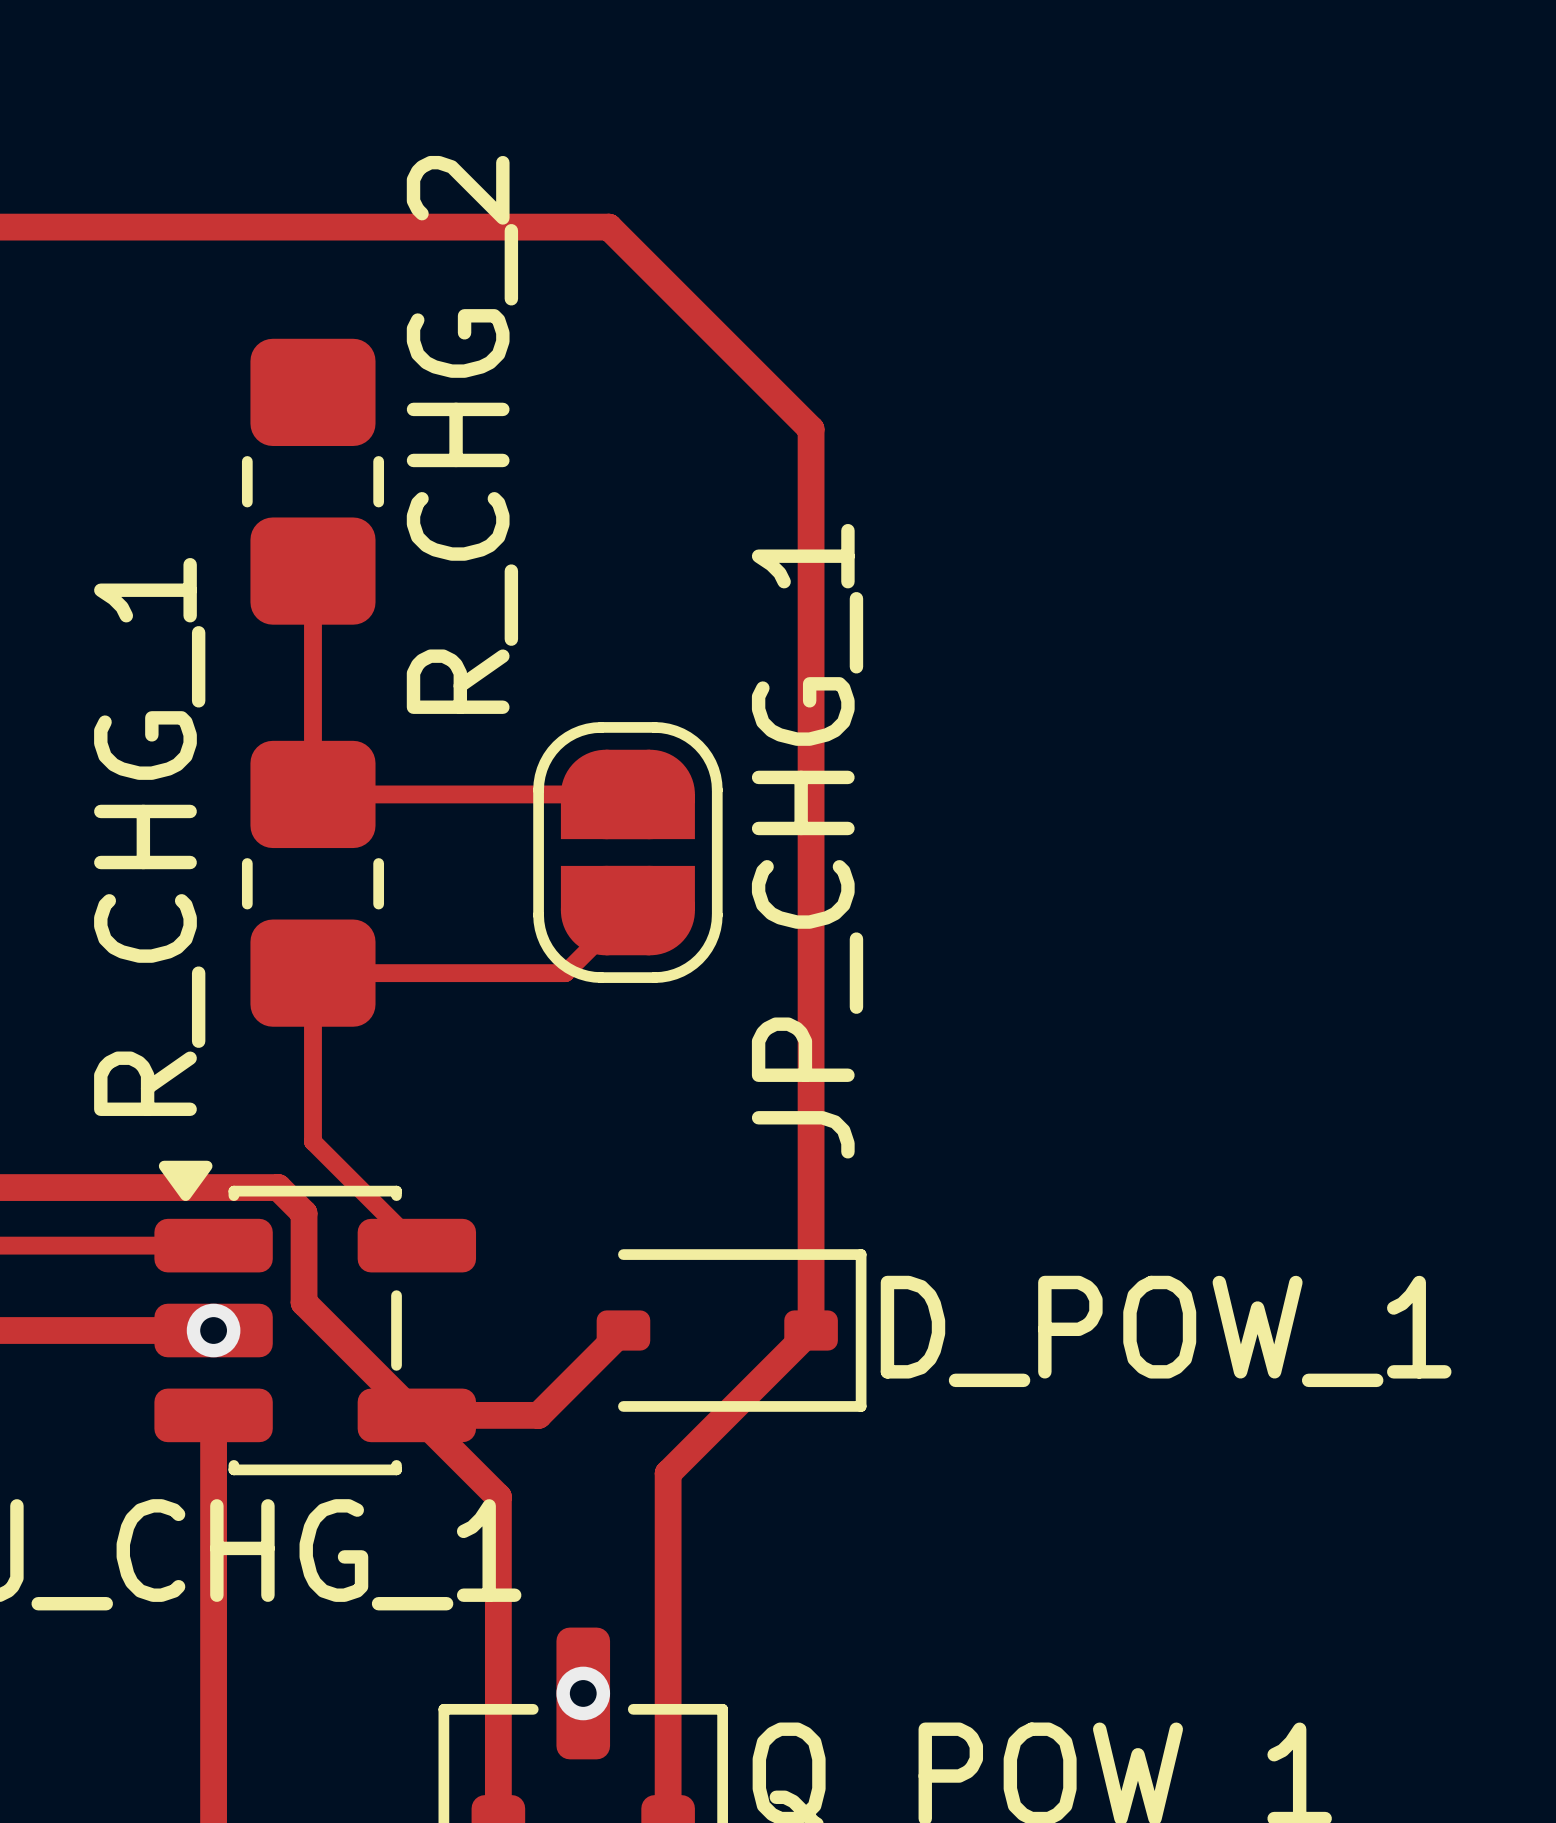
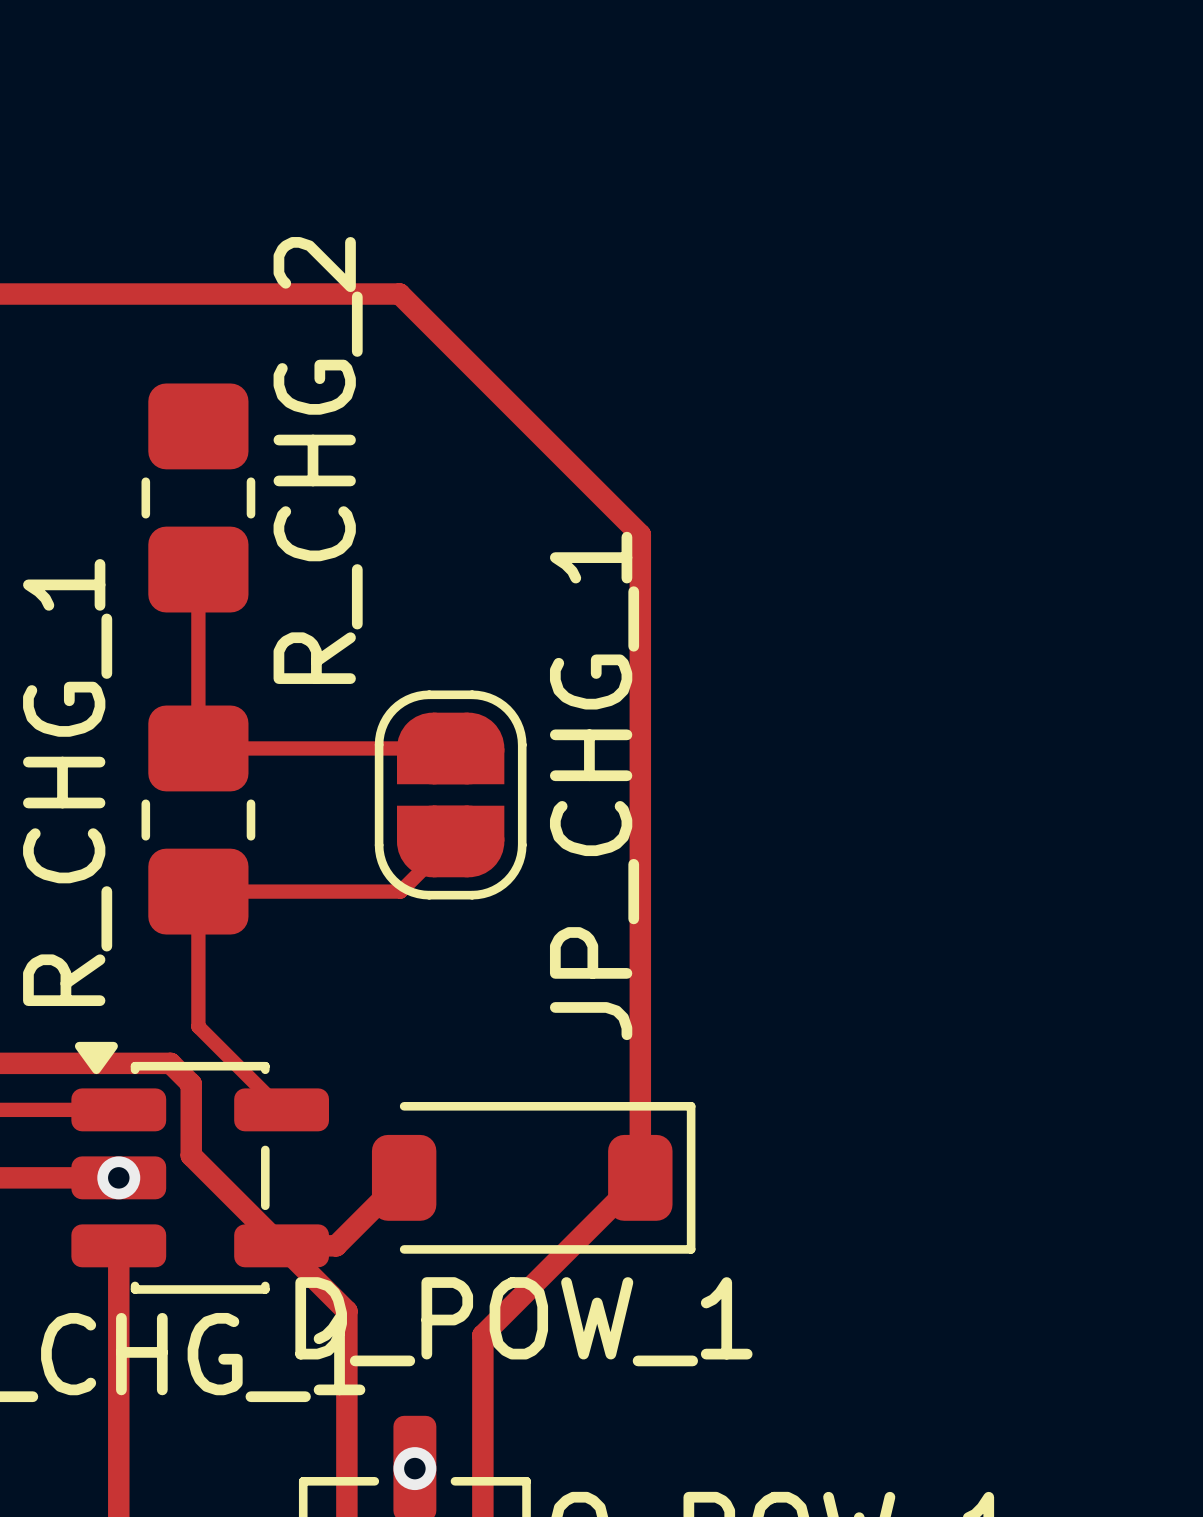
track: (564, 227) (608, 227) (811, 429) (811, 1330) (668, 1473) (668, 1527) -> (399, 294) (640, 534) (640, 1177) (482, 1335)
D_POW_1 footprint: [596, 1249, 867, 1412] -> [371, 1102, 696, 1254]
track: (623, 1330) (538, 1415) (484, 1415) -> (404, 1177) (336, 1245)
D_POW_1 name position: D_POW_1 (1166, 1331) -> D_POW_1 (523, 1321)

